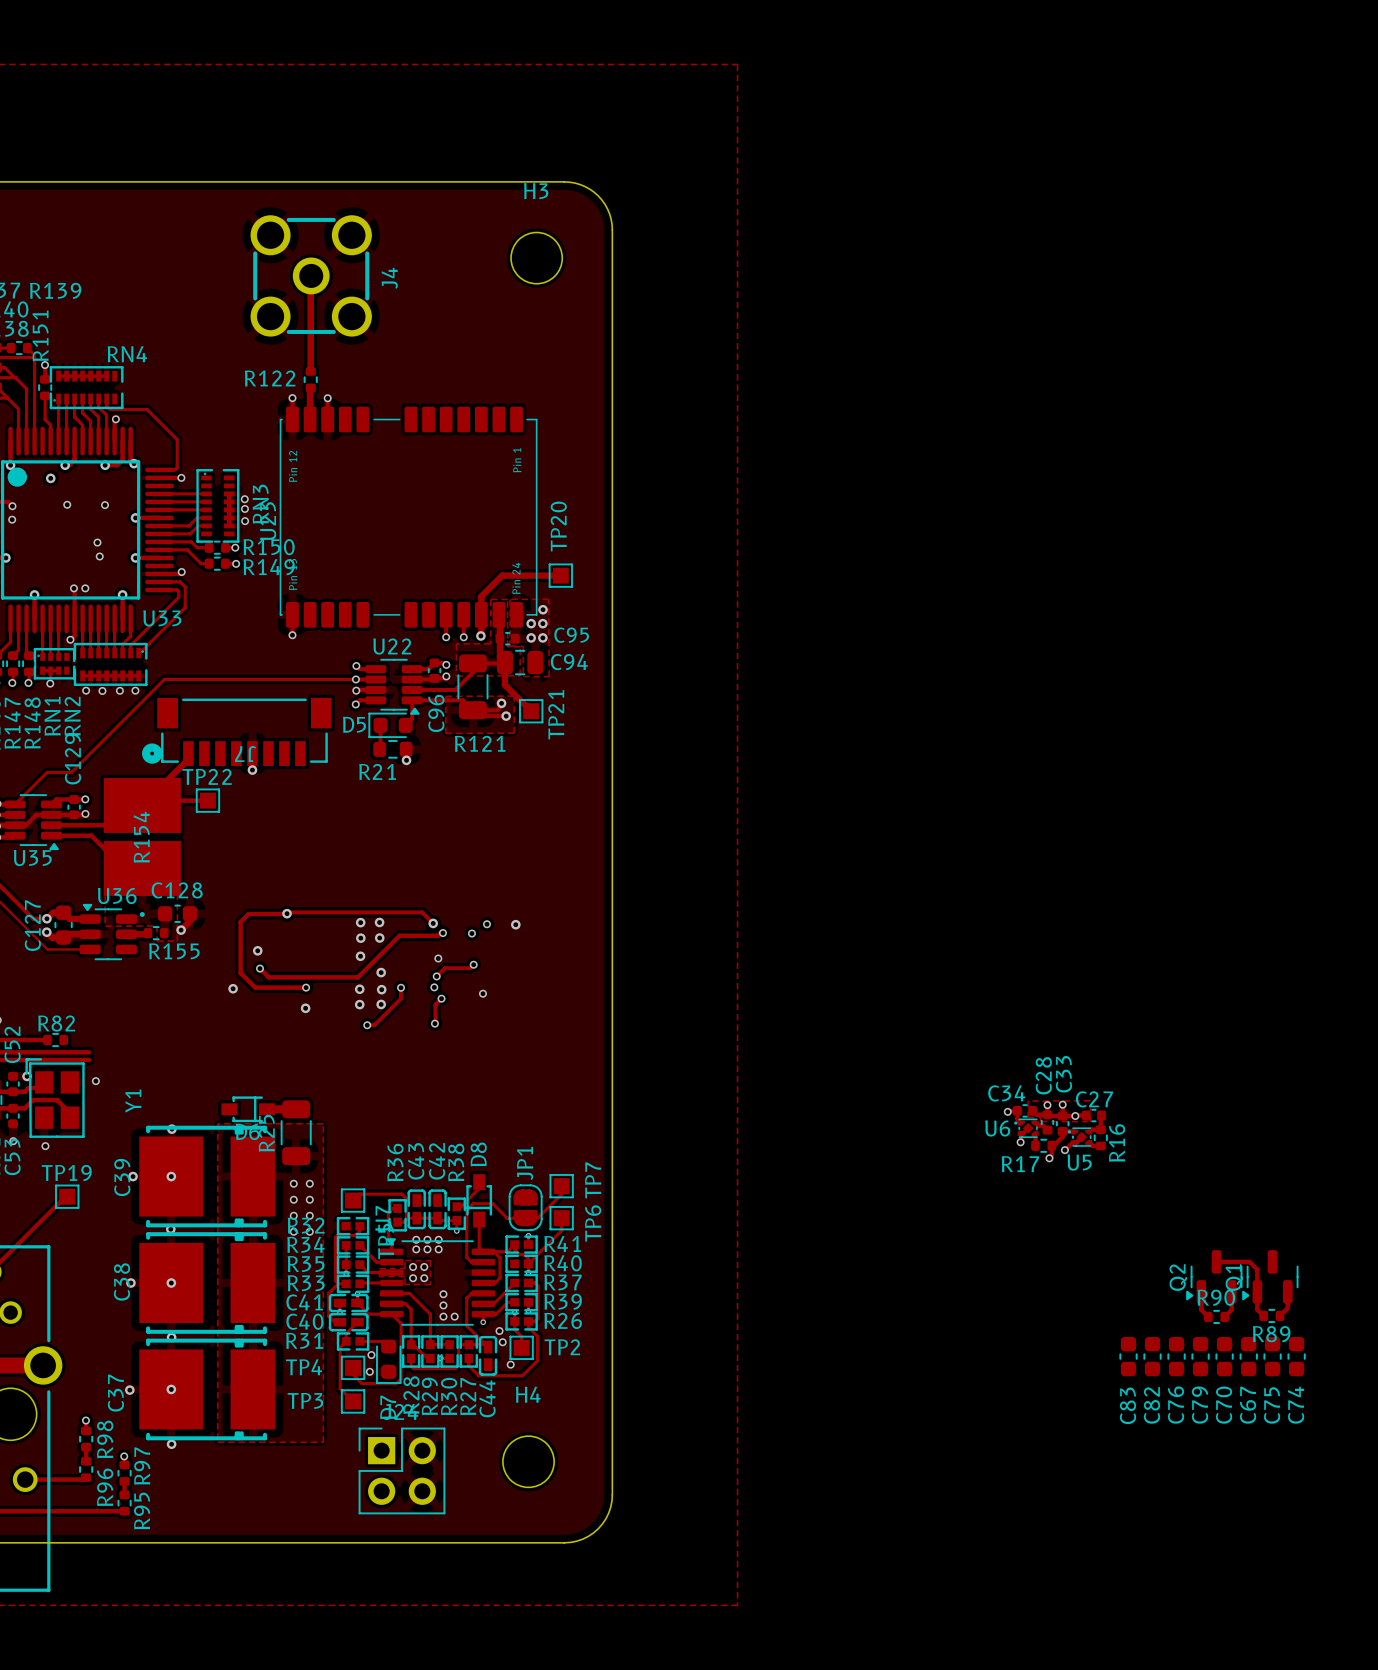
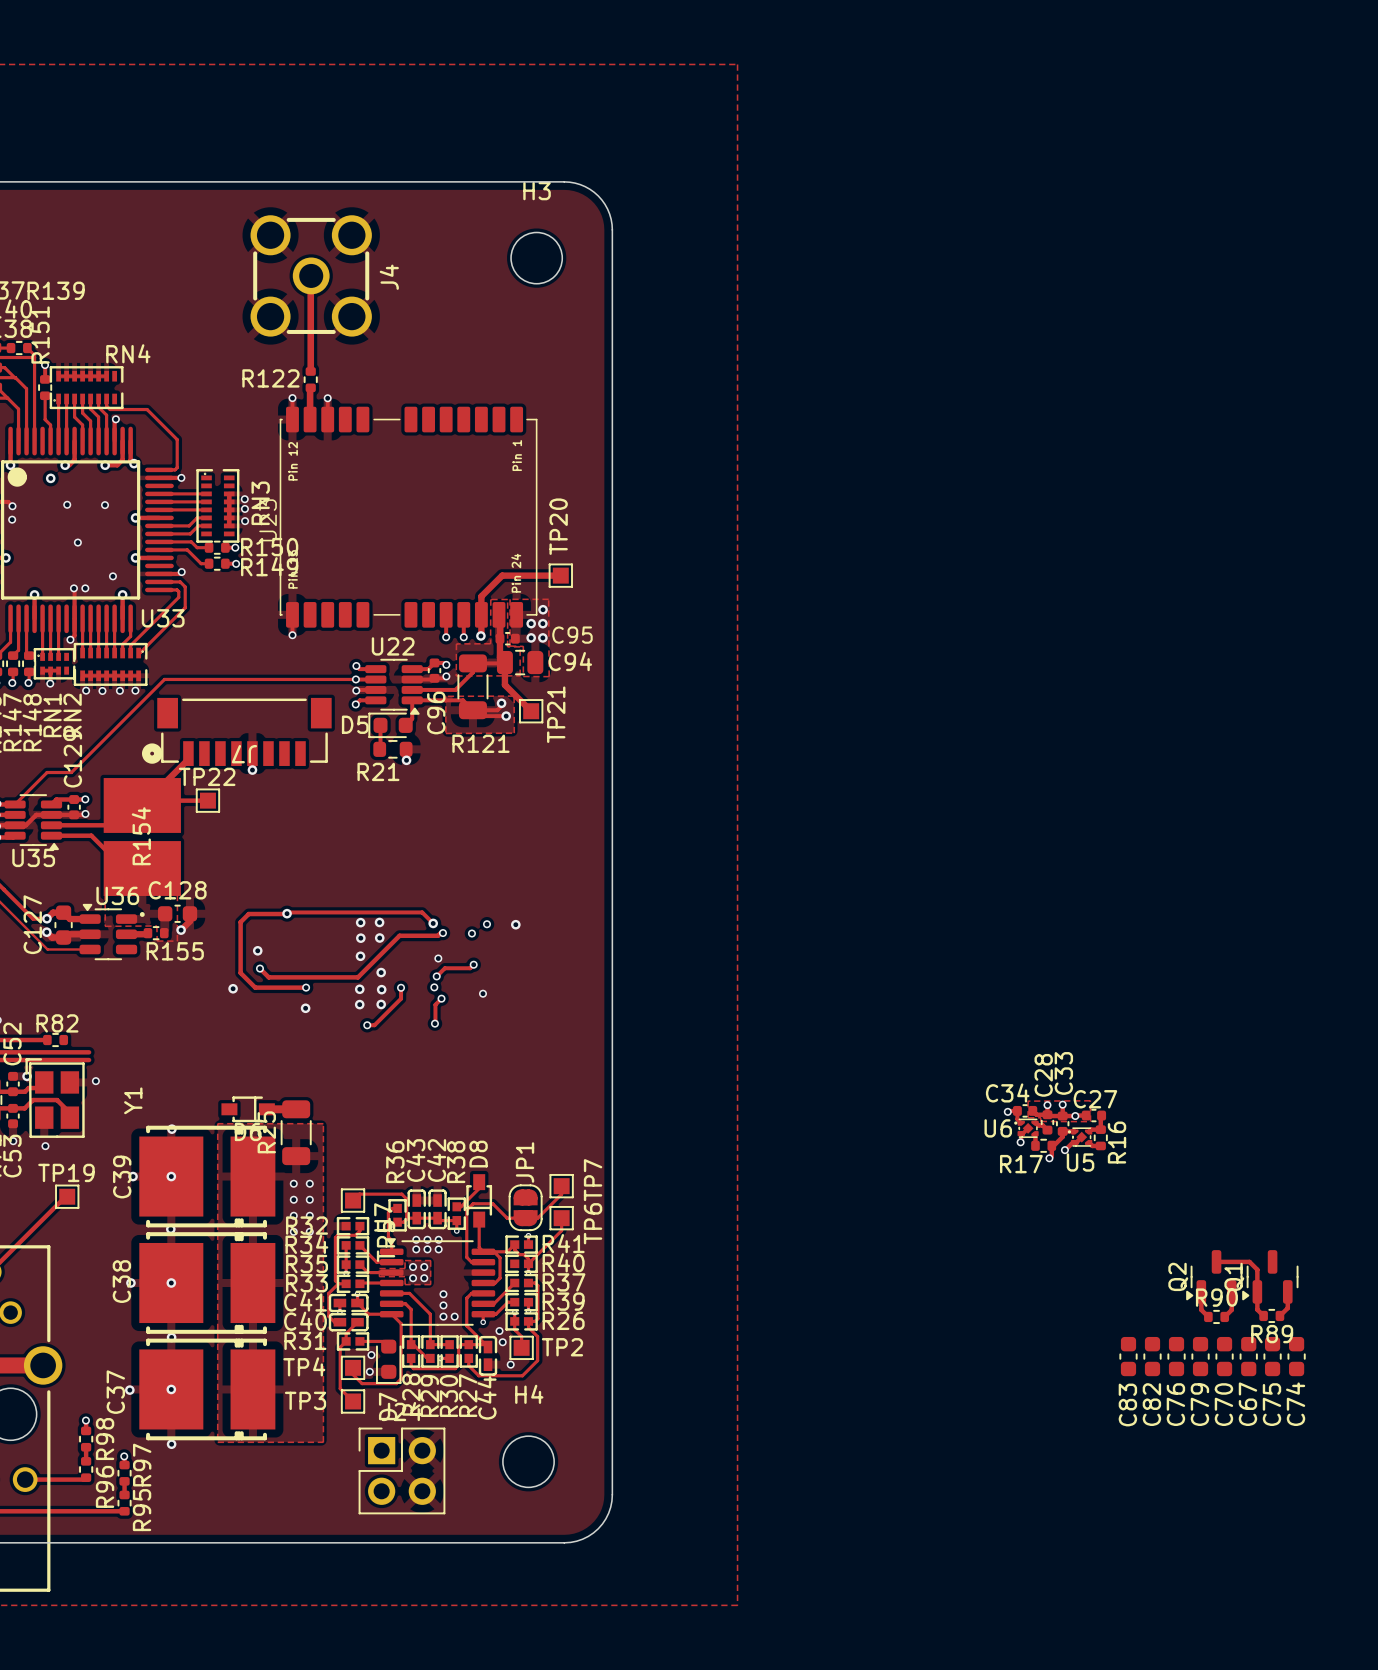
via: none -> (77, 542)
via: (97, 542) -> none
via: (99, 556) -> none
via: none -> (112, 576)

